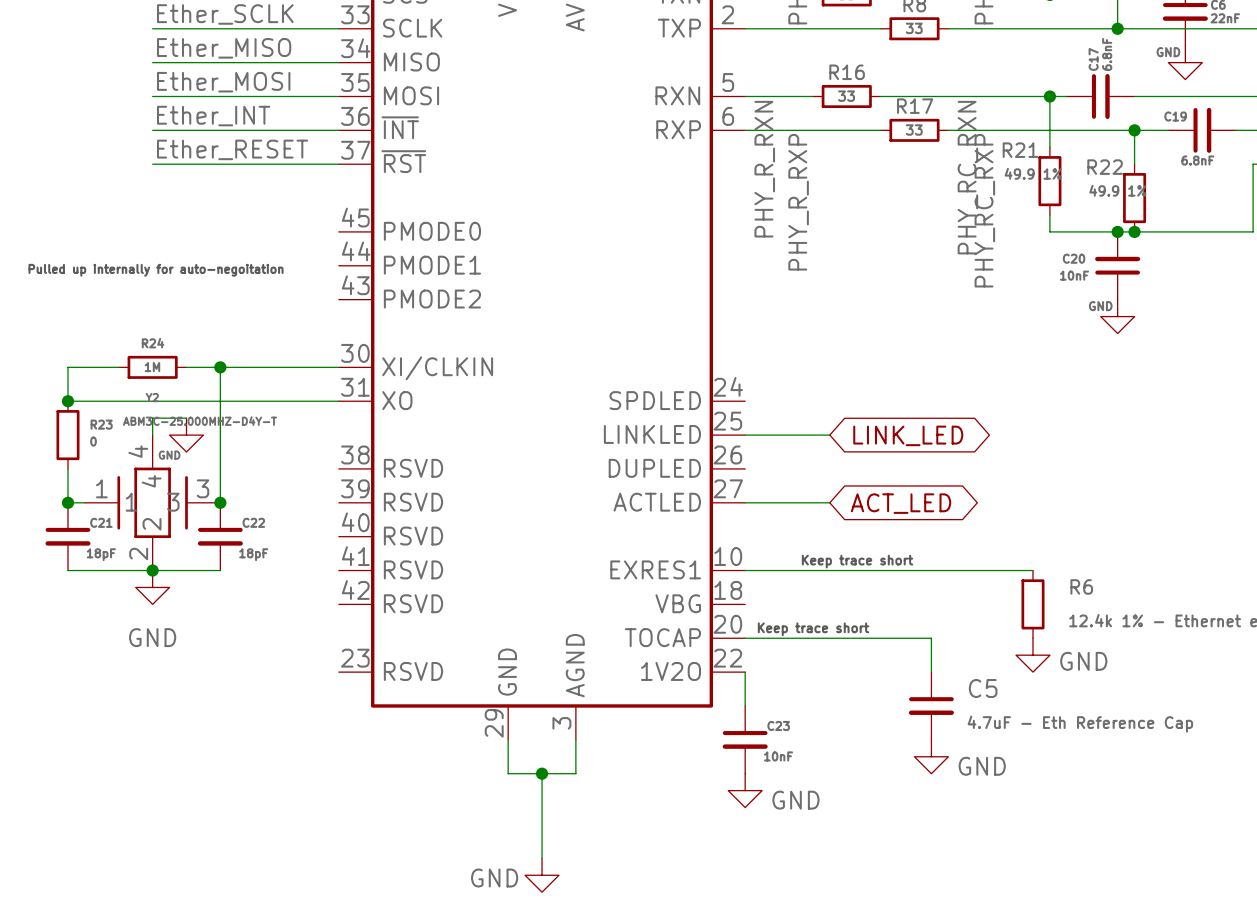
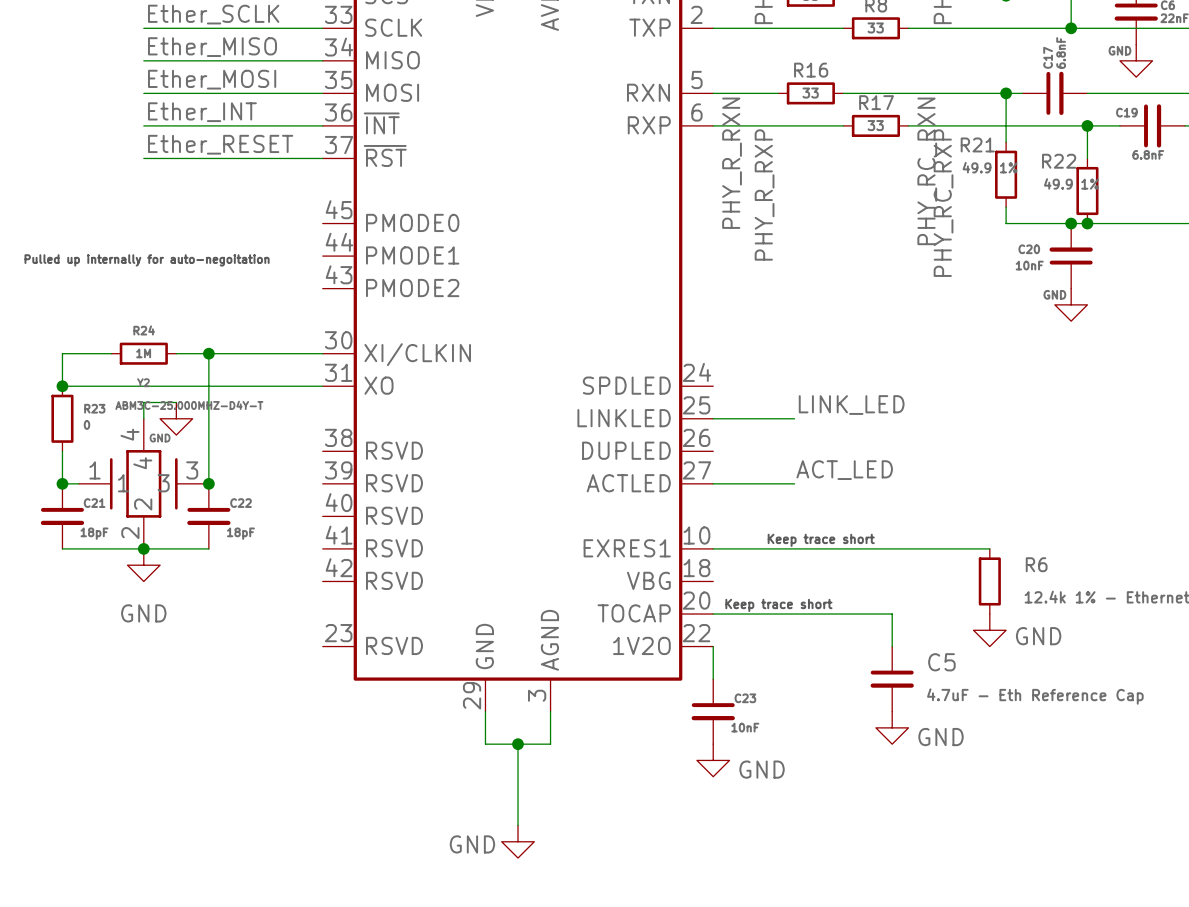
label: none -> LINK_LED (851, 405)
global label: LINK_LED (908, 435) -> none
label: none -> ACT_LED (844, 470)
global label: ACT_LED (901, 503) -> none

